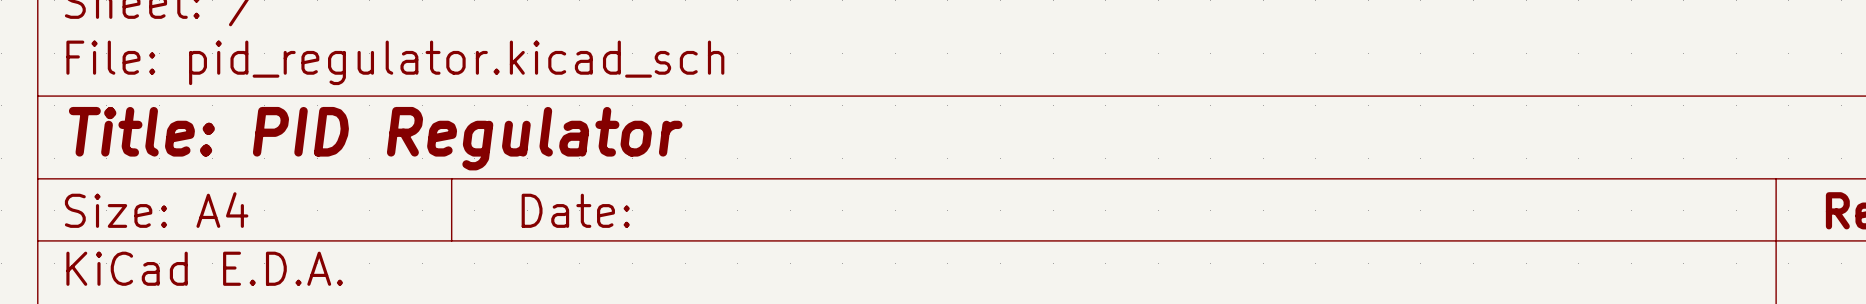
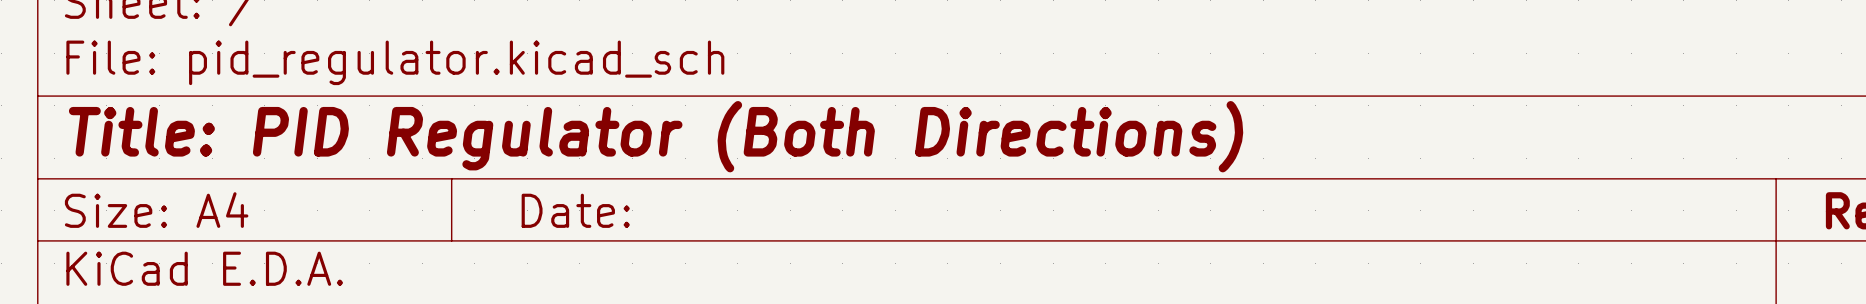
title block: Title: PID Regulator (375, 138) -> Title: PID Regulator (Both Directions) (656, 136)

